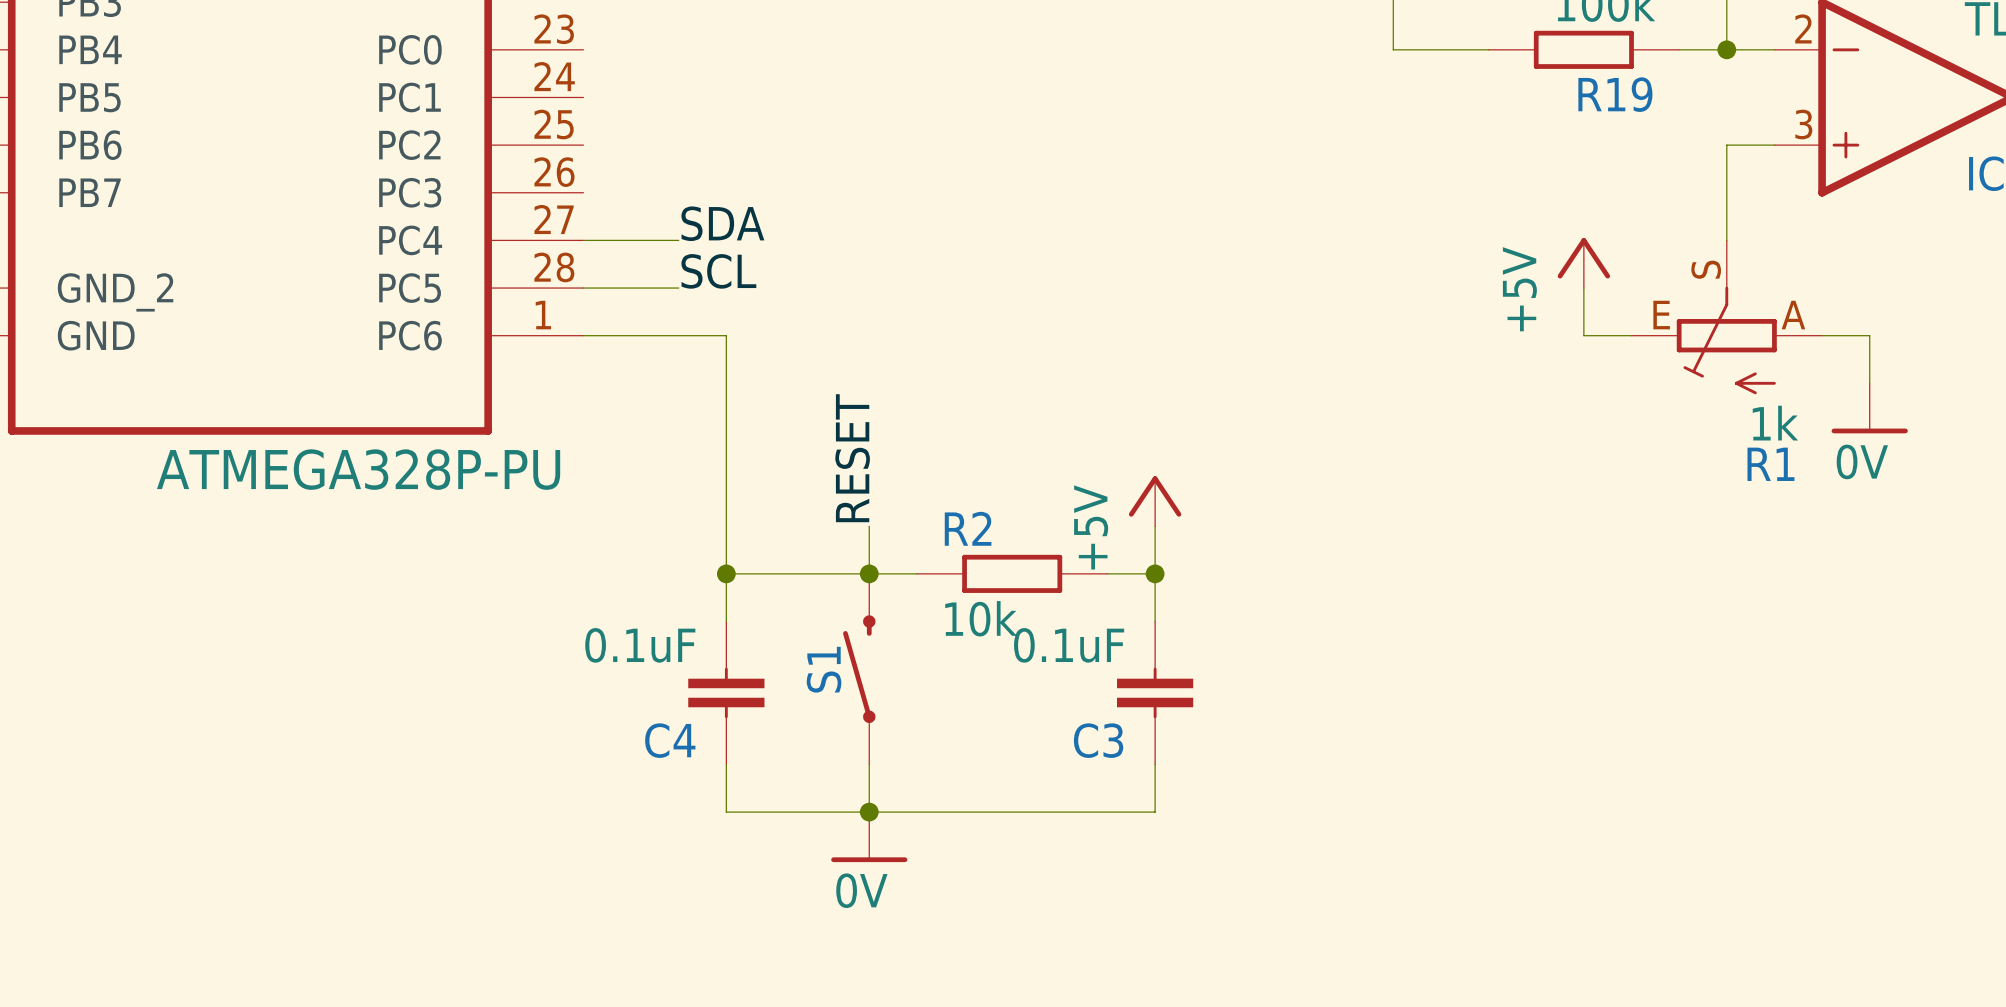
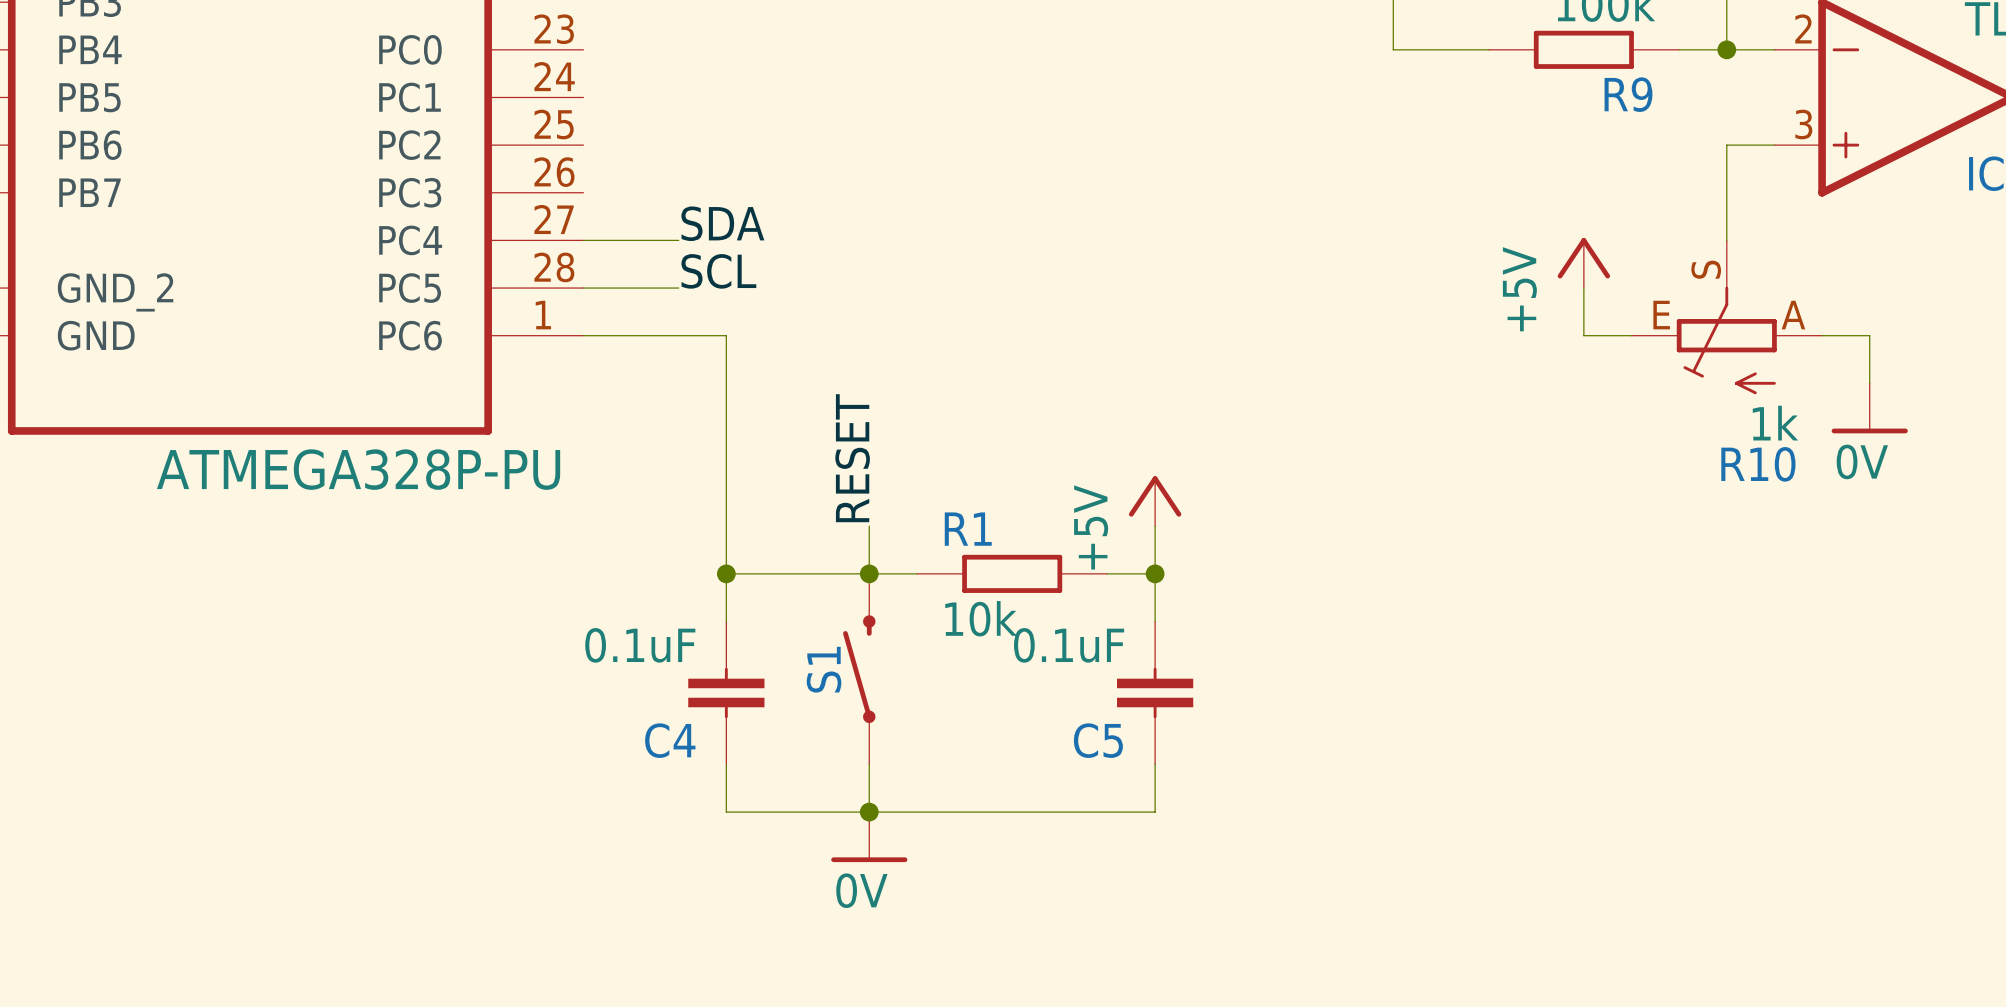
R19 name: R19 (1615, 94) -> R9 (1628, 94)
R1 name: R1 (1770, 464) -> R10 (1758, 464)
R2 name: R2 (968, 528) -> R1 (968, 529)
C3 name: C3 (1098, 740) -> C5 (1098, 740)

